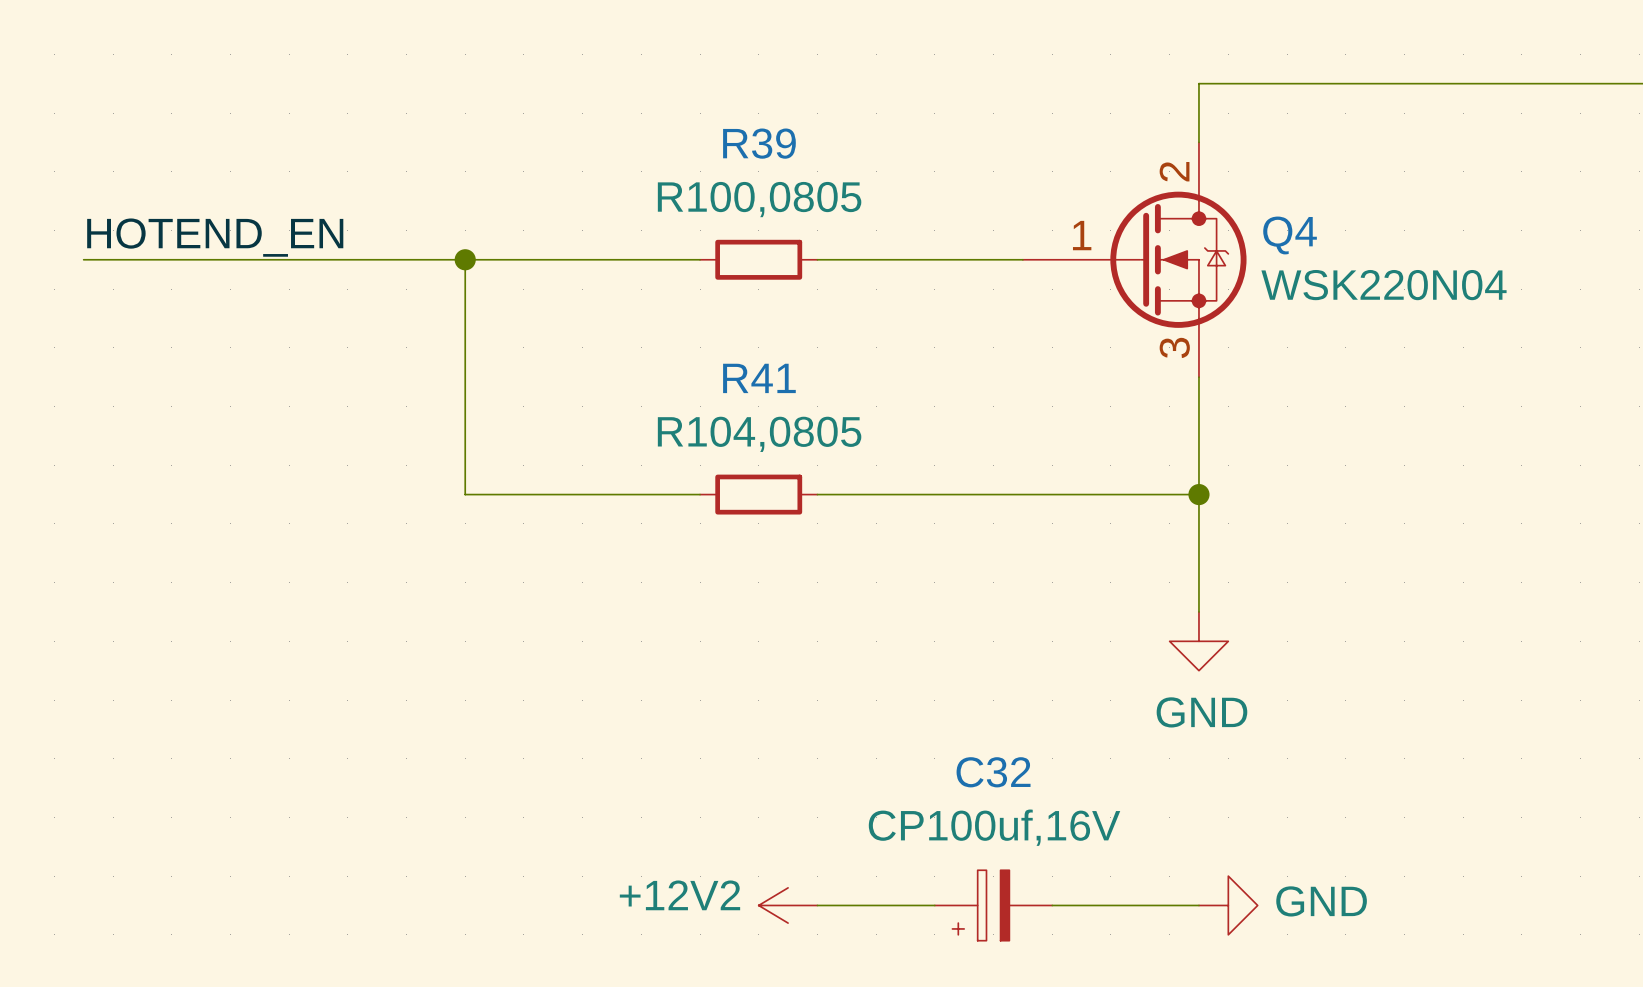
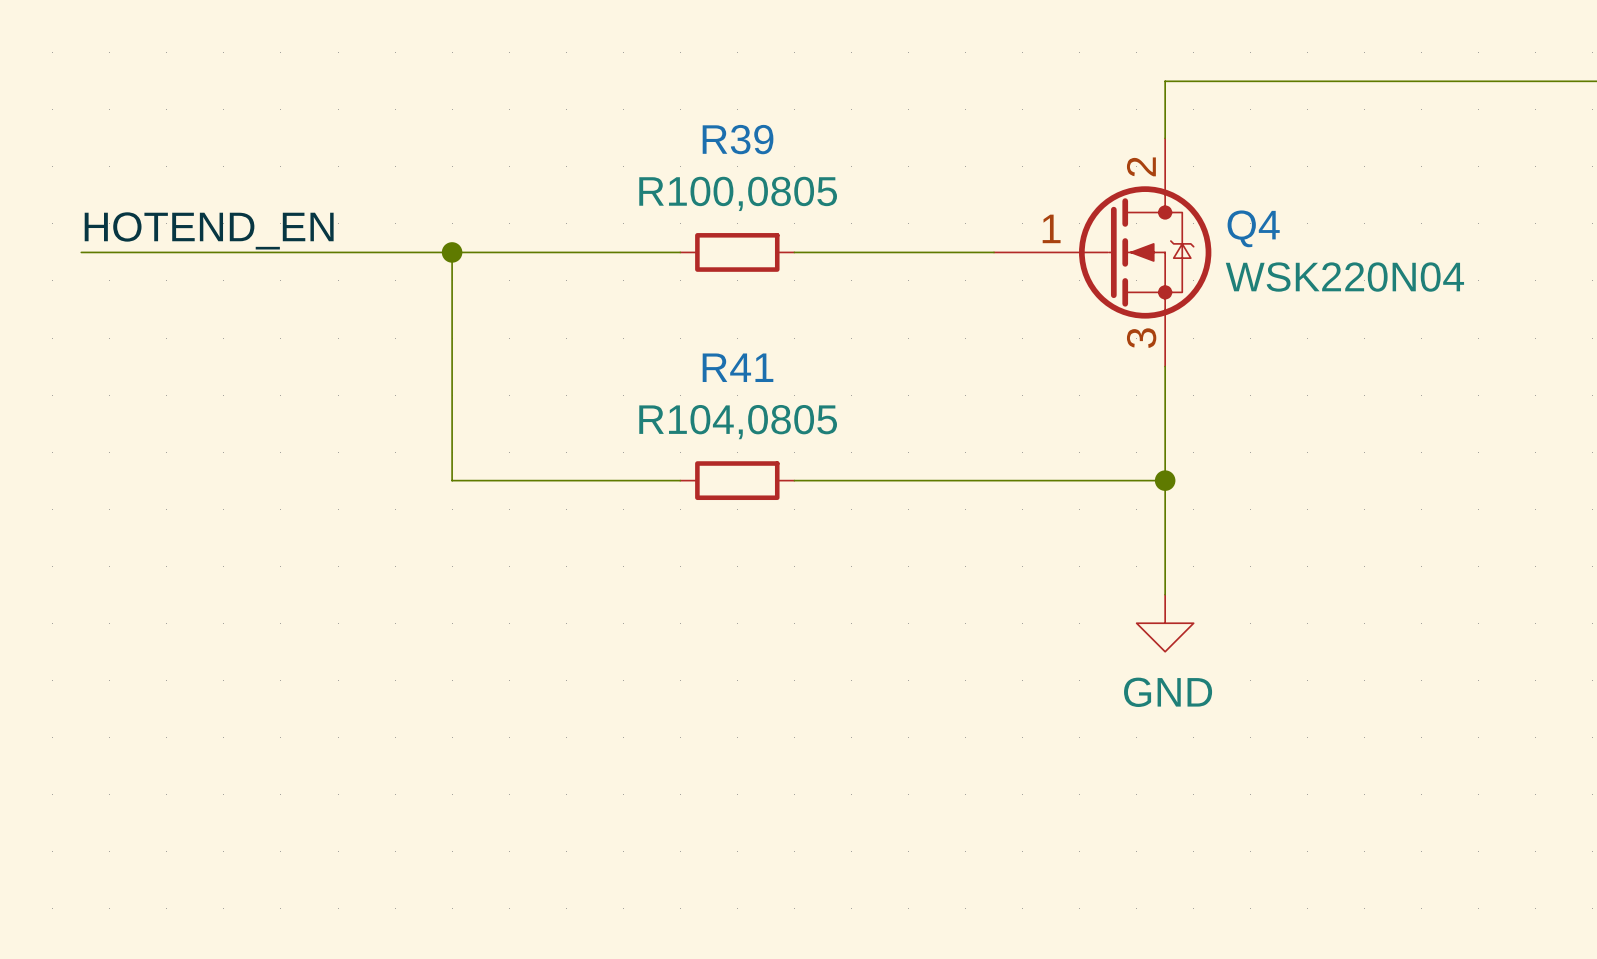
power symbol: +12V2 (788, 905) -> none
wire: (817, 905) (934, 905) -> none
C32: CP100uf,16V (993, 905) -> none
wire: (1052, 905) (1198, 905) -> none
power symbol: GND (1228, 905) -> none

